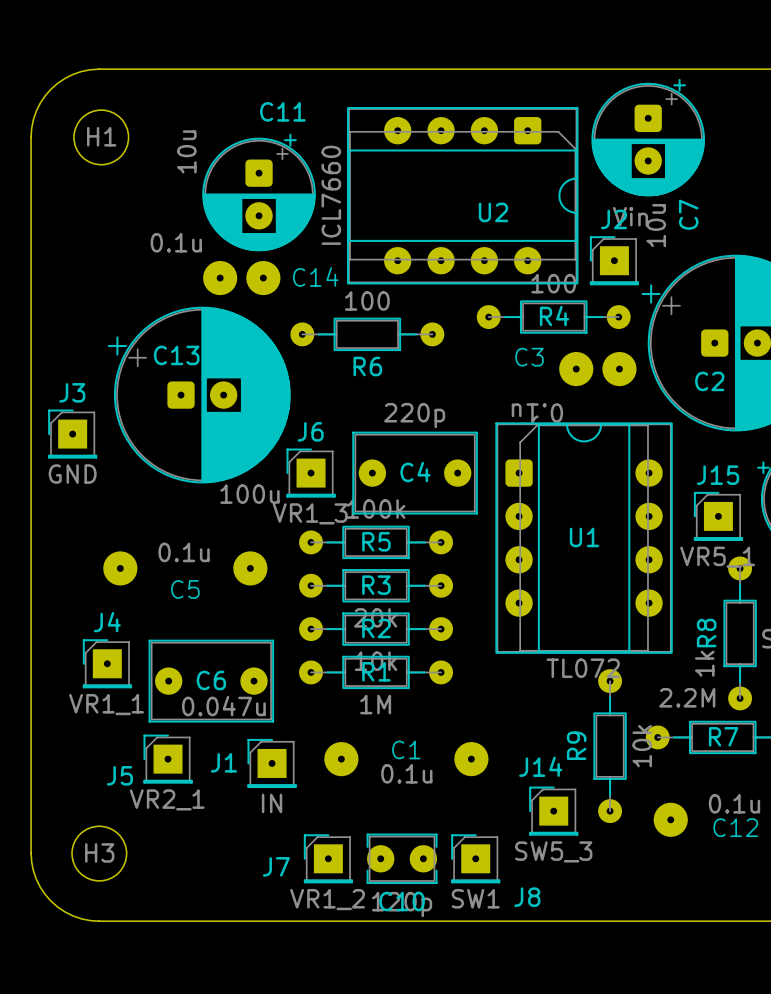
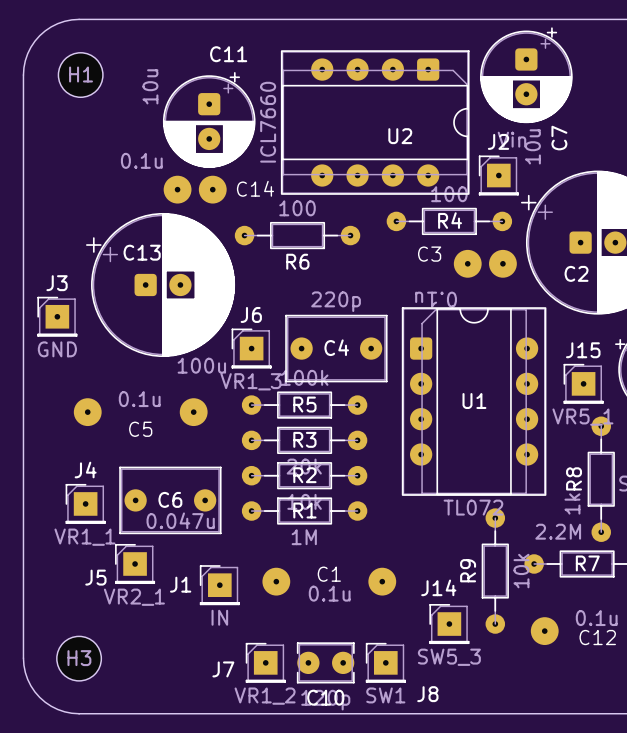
C5 position: (185, 568) -> (140, 412)
C6 position: (211, 681) -> (170, 500)
J5 position: (168, 759) -> (135, 563)

